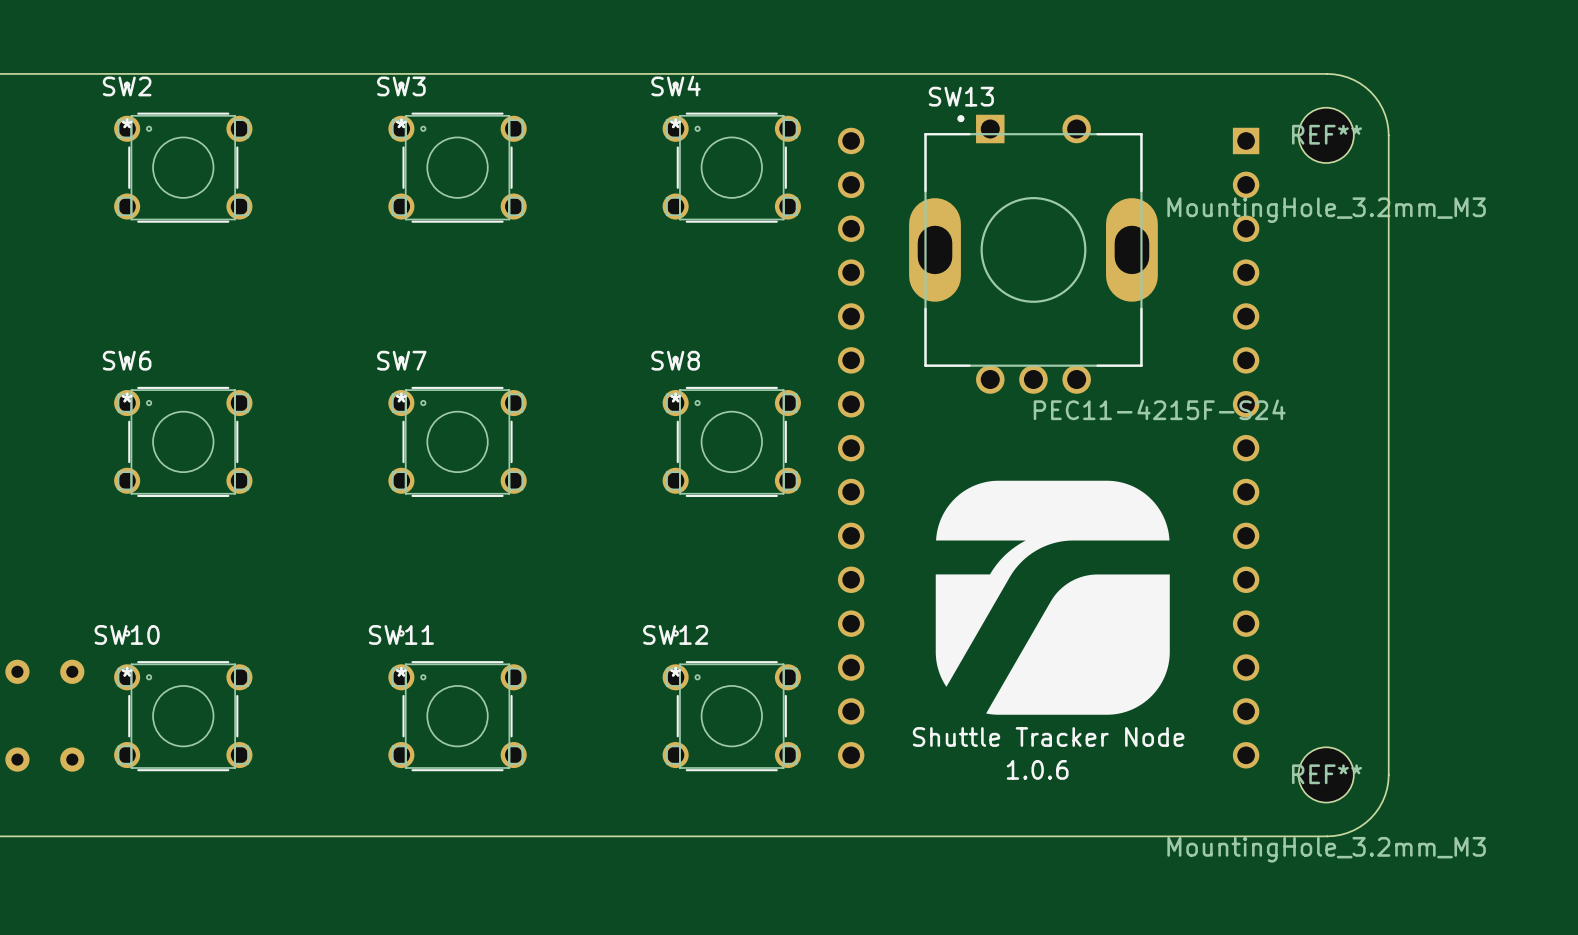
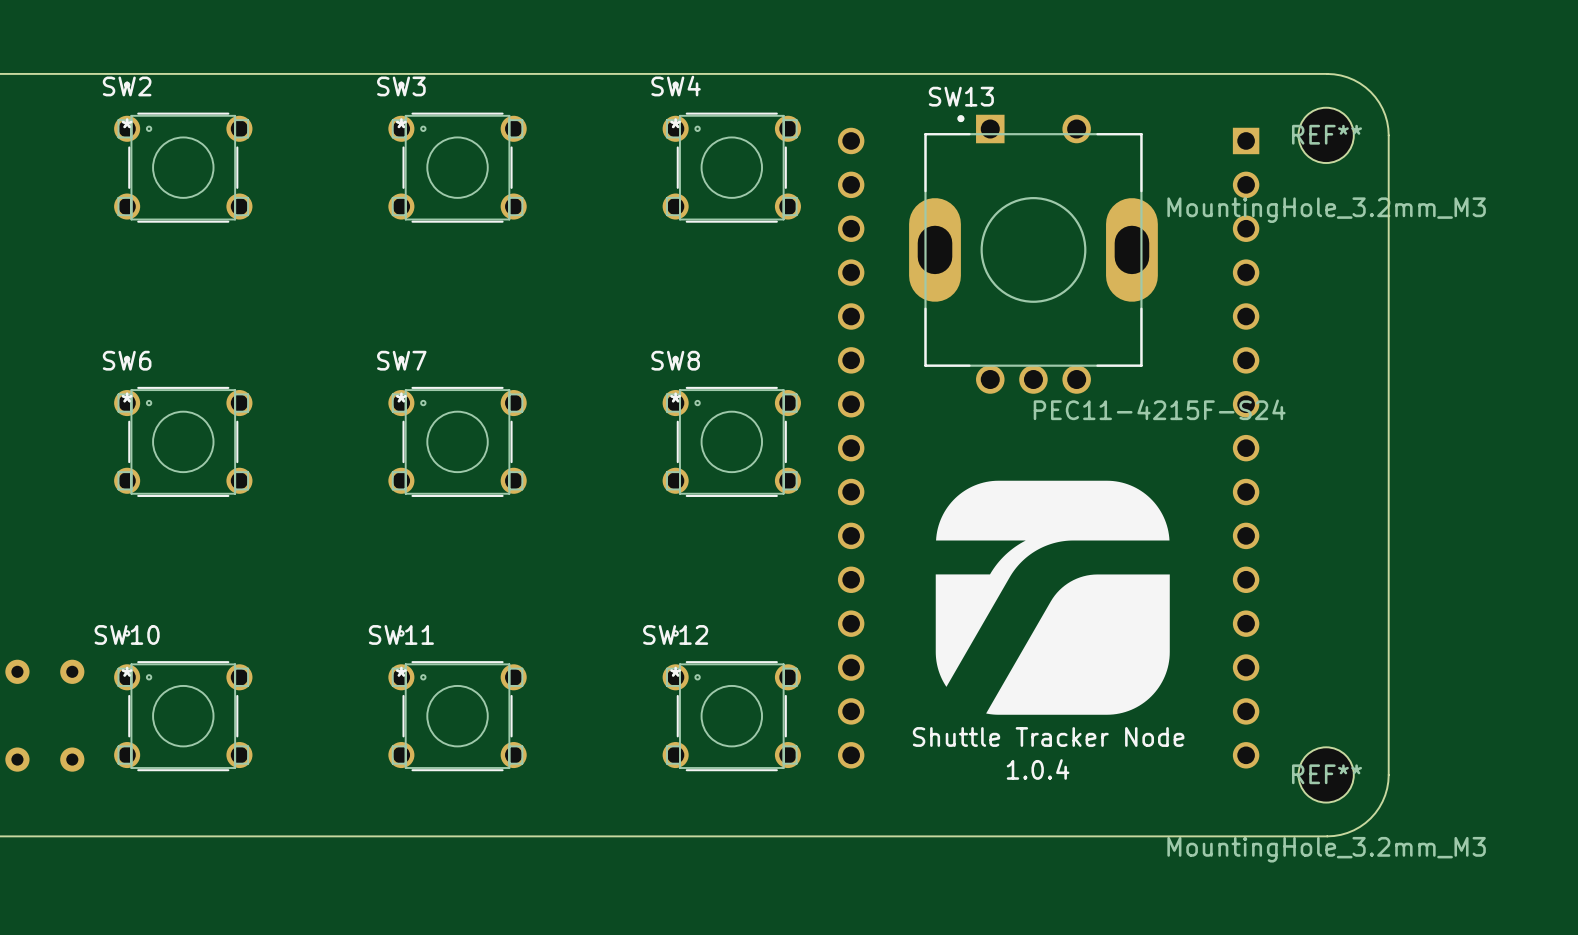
text: 1.0.6 (1037, 769) -> 1.0.4 (1038, 769)

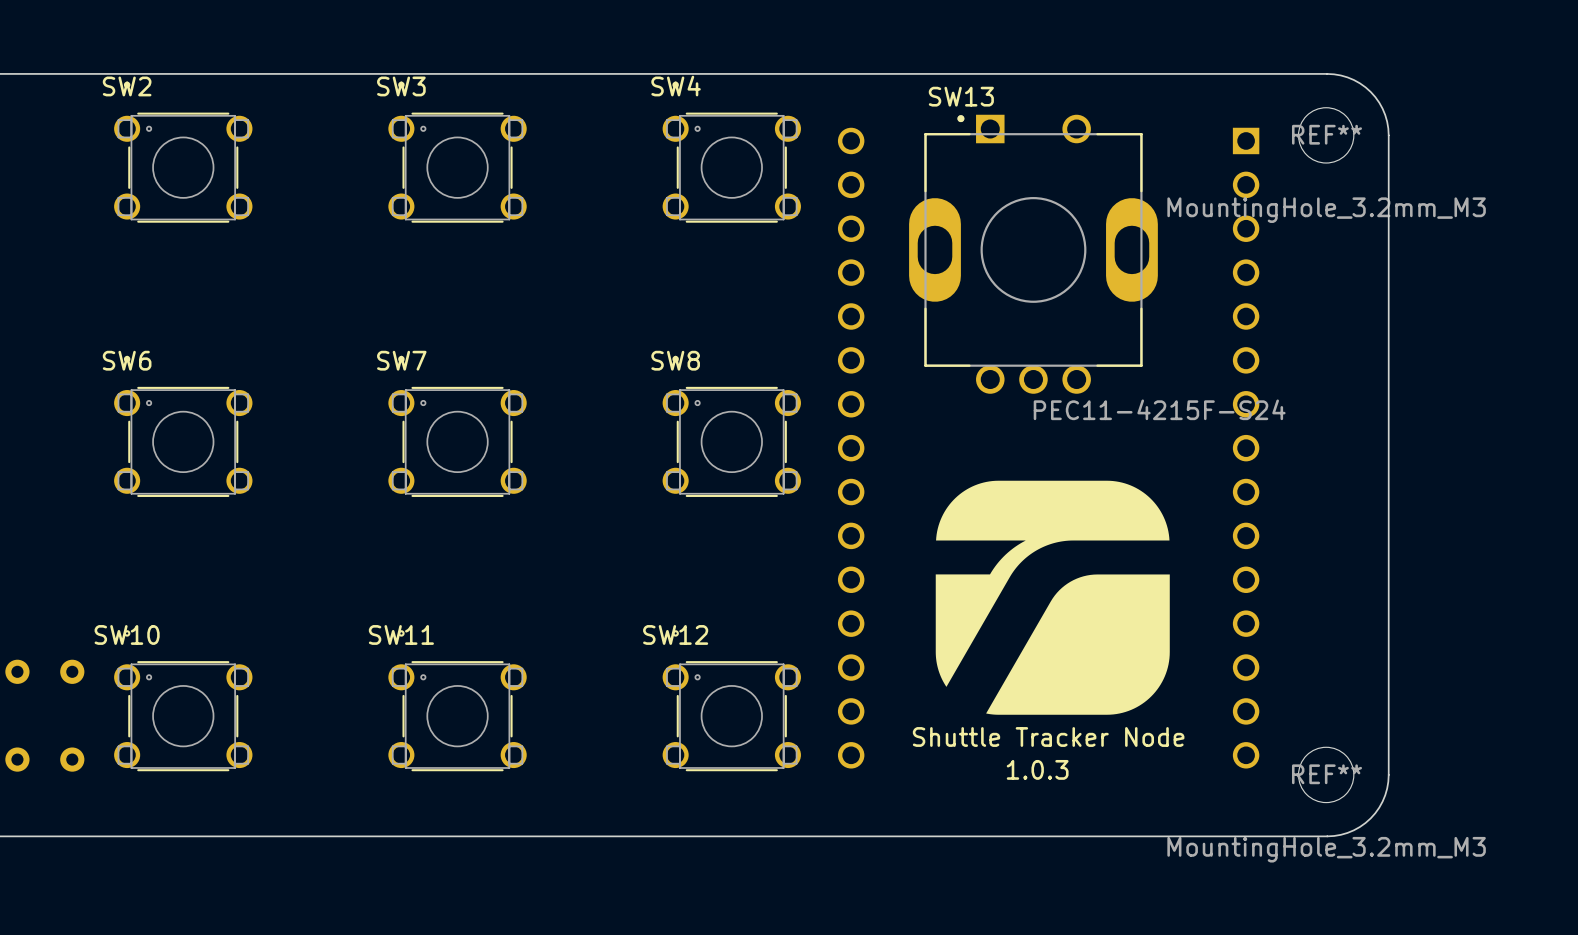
SW2 footprint: [114, 81, 253, 223] -> [114, 81, 253, 223]
SW3 footprint: [388, 81, 527, 223] -> [388, 81, 527, 223]
SW4 footprint: [662, 81, 801, 223] -> [662, 81, 801, 223]
SW6 footprint: [114, 355, 253, 497] -> [114, 355, 253, 497]
SW7 footprint: [388, 355, 527, 497] -> [388, 355, 527, 497]
SW8 footprint: [662, 355, 801, 497] -> [662, 355, 801, 497]
SW10 footprint: [114, 630, 253, 772] -> [114, 630, 253, 772]
SW11 footprint: [388, 630, 527, 772] -> [388, 630, 527, 772]
SW12 footprint: [662, 630, 801, 772] -> [662, 630, 801, 772]
text: 1.0.4 (1038, 769) -> 1.0.3 (1037, 769)

